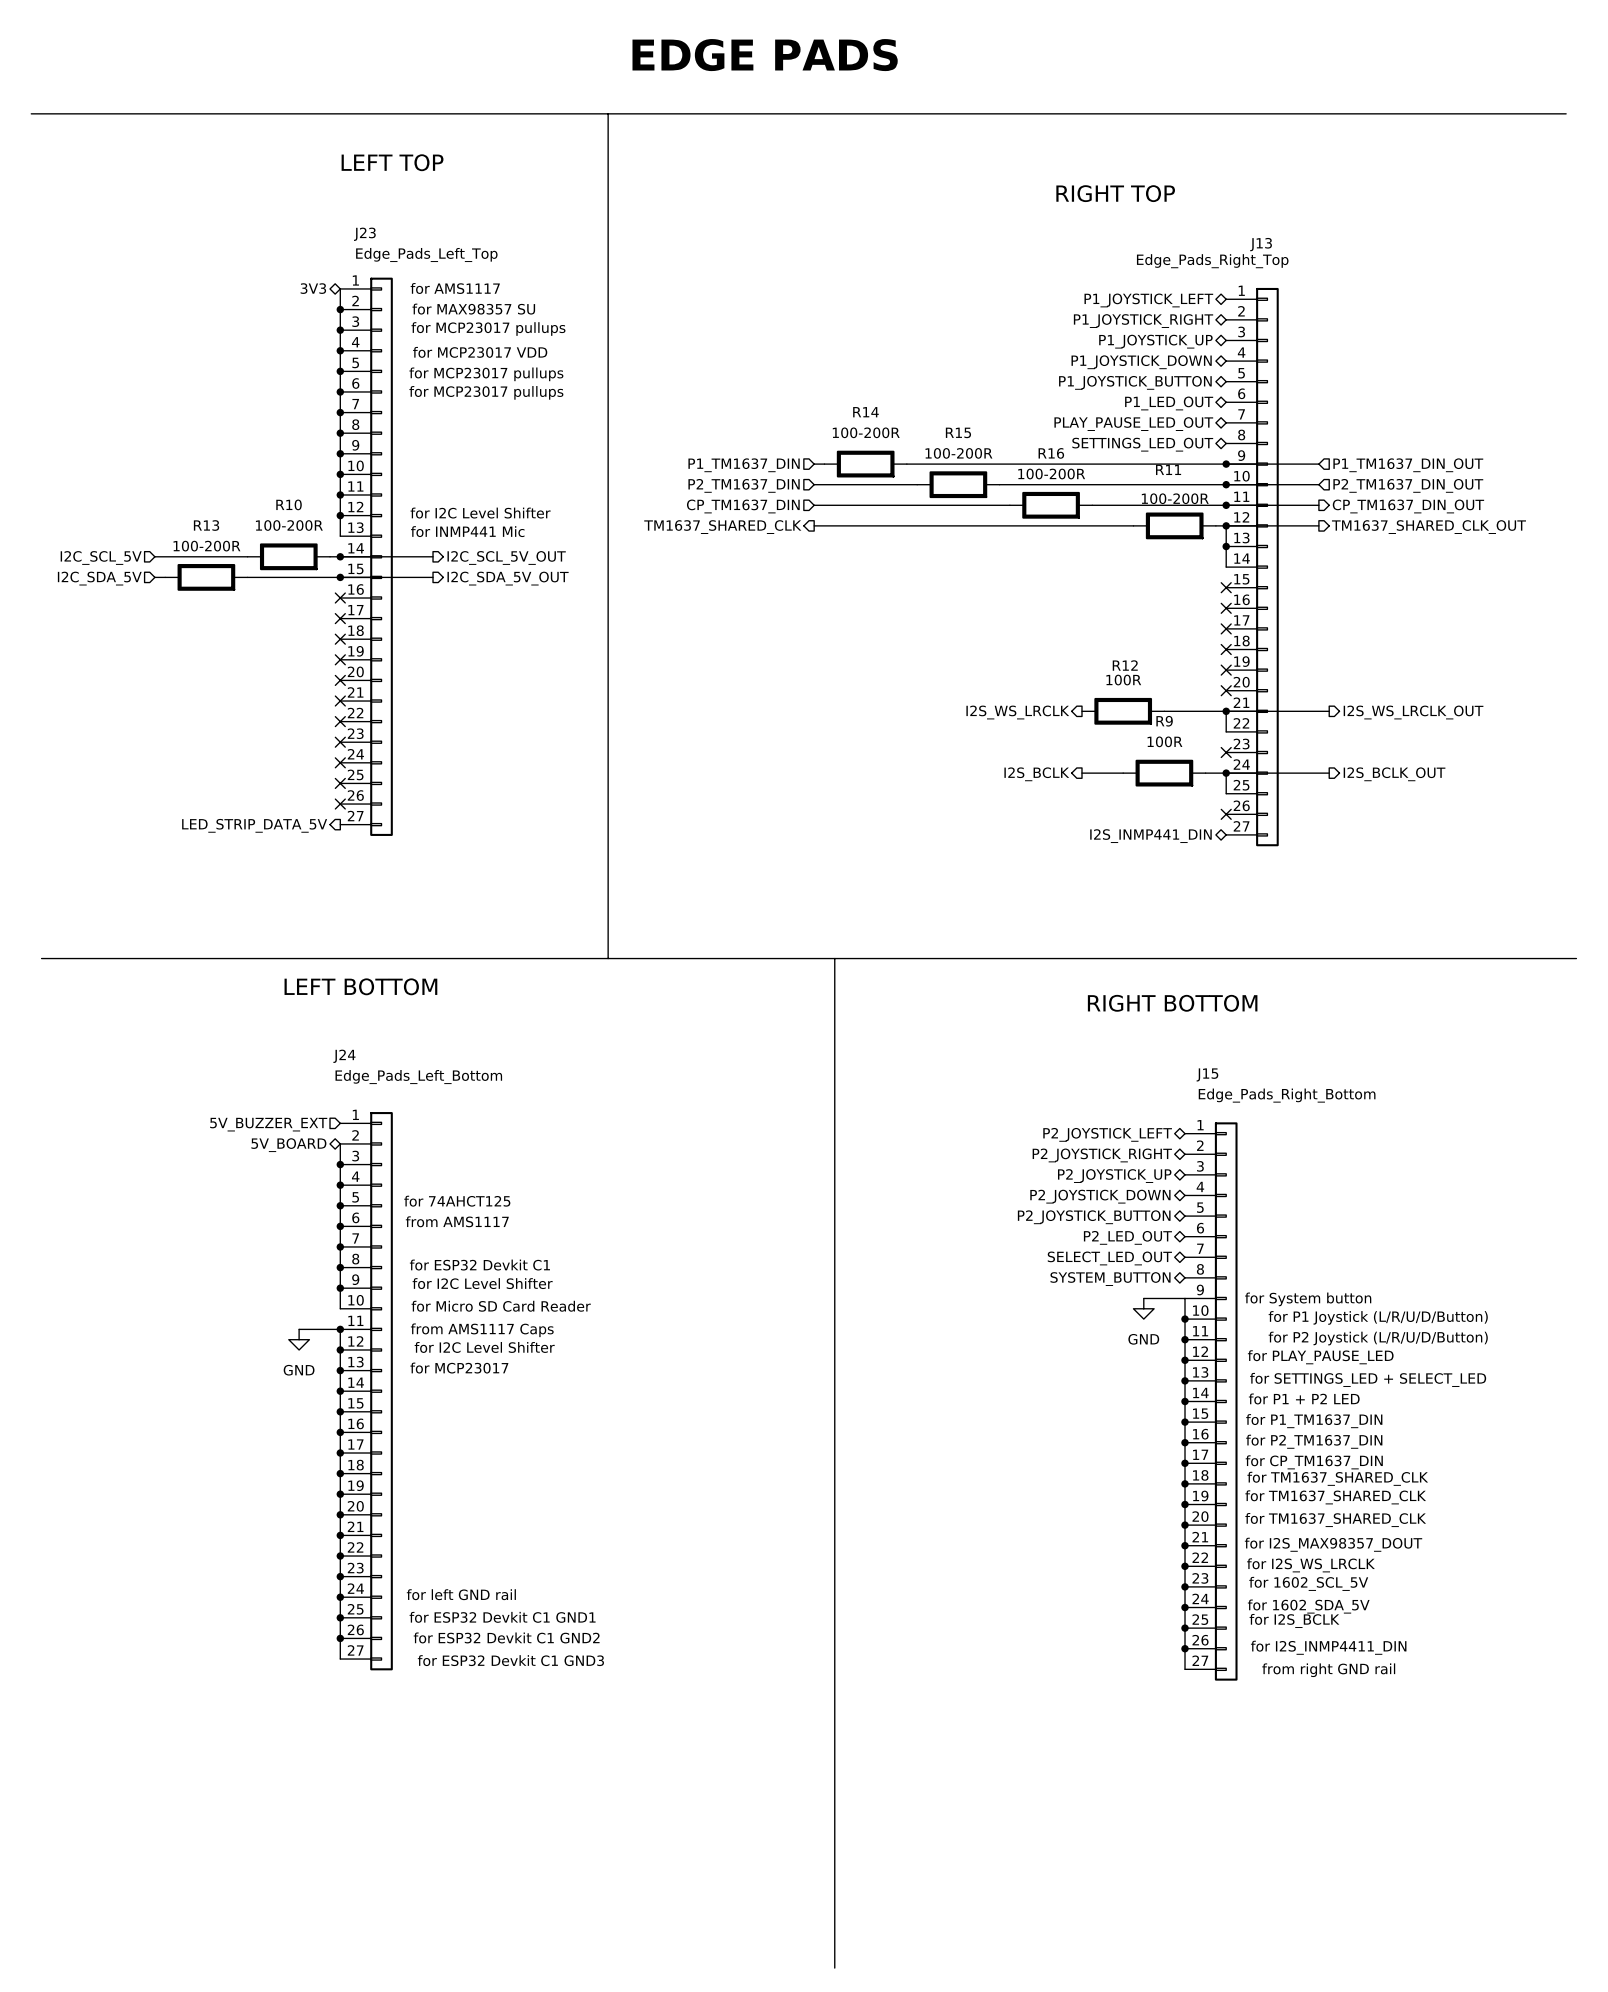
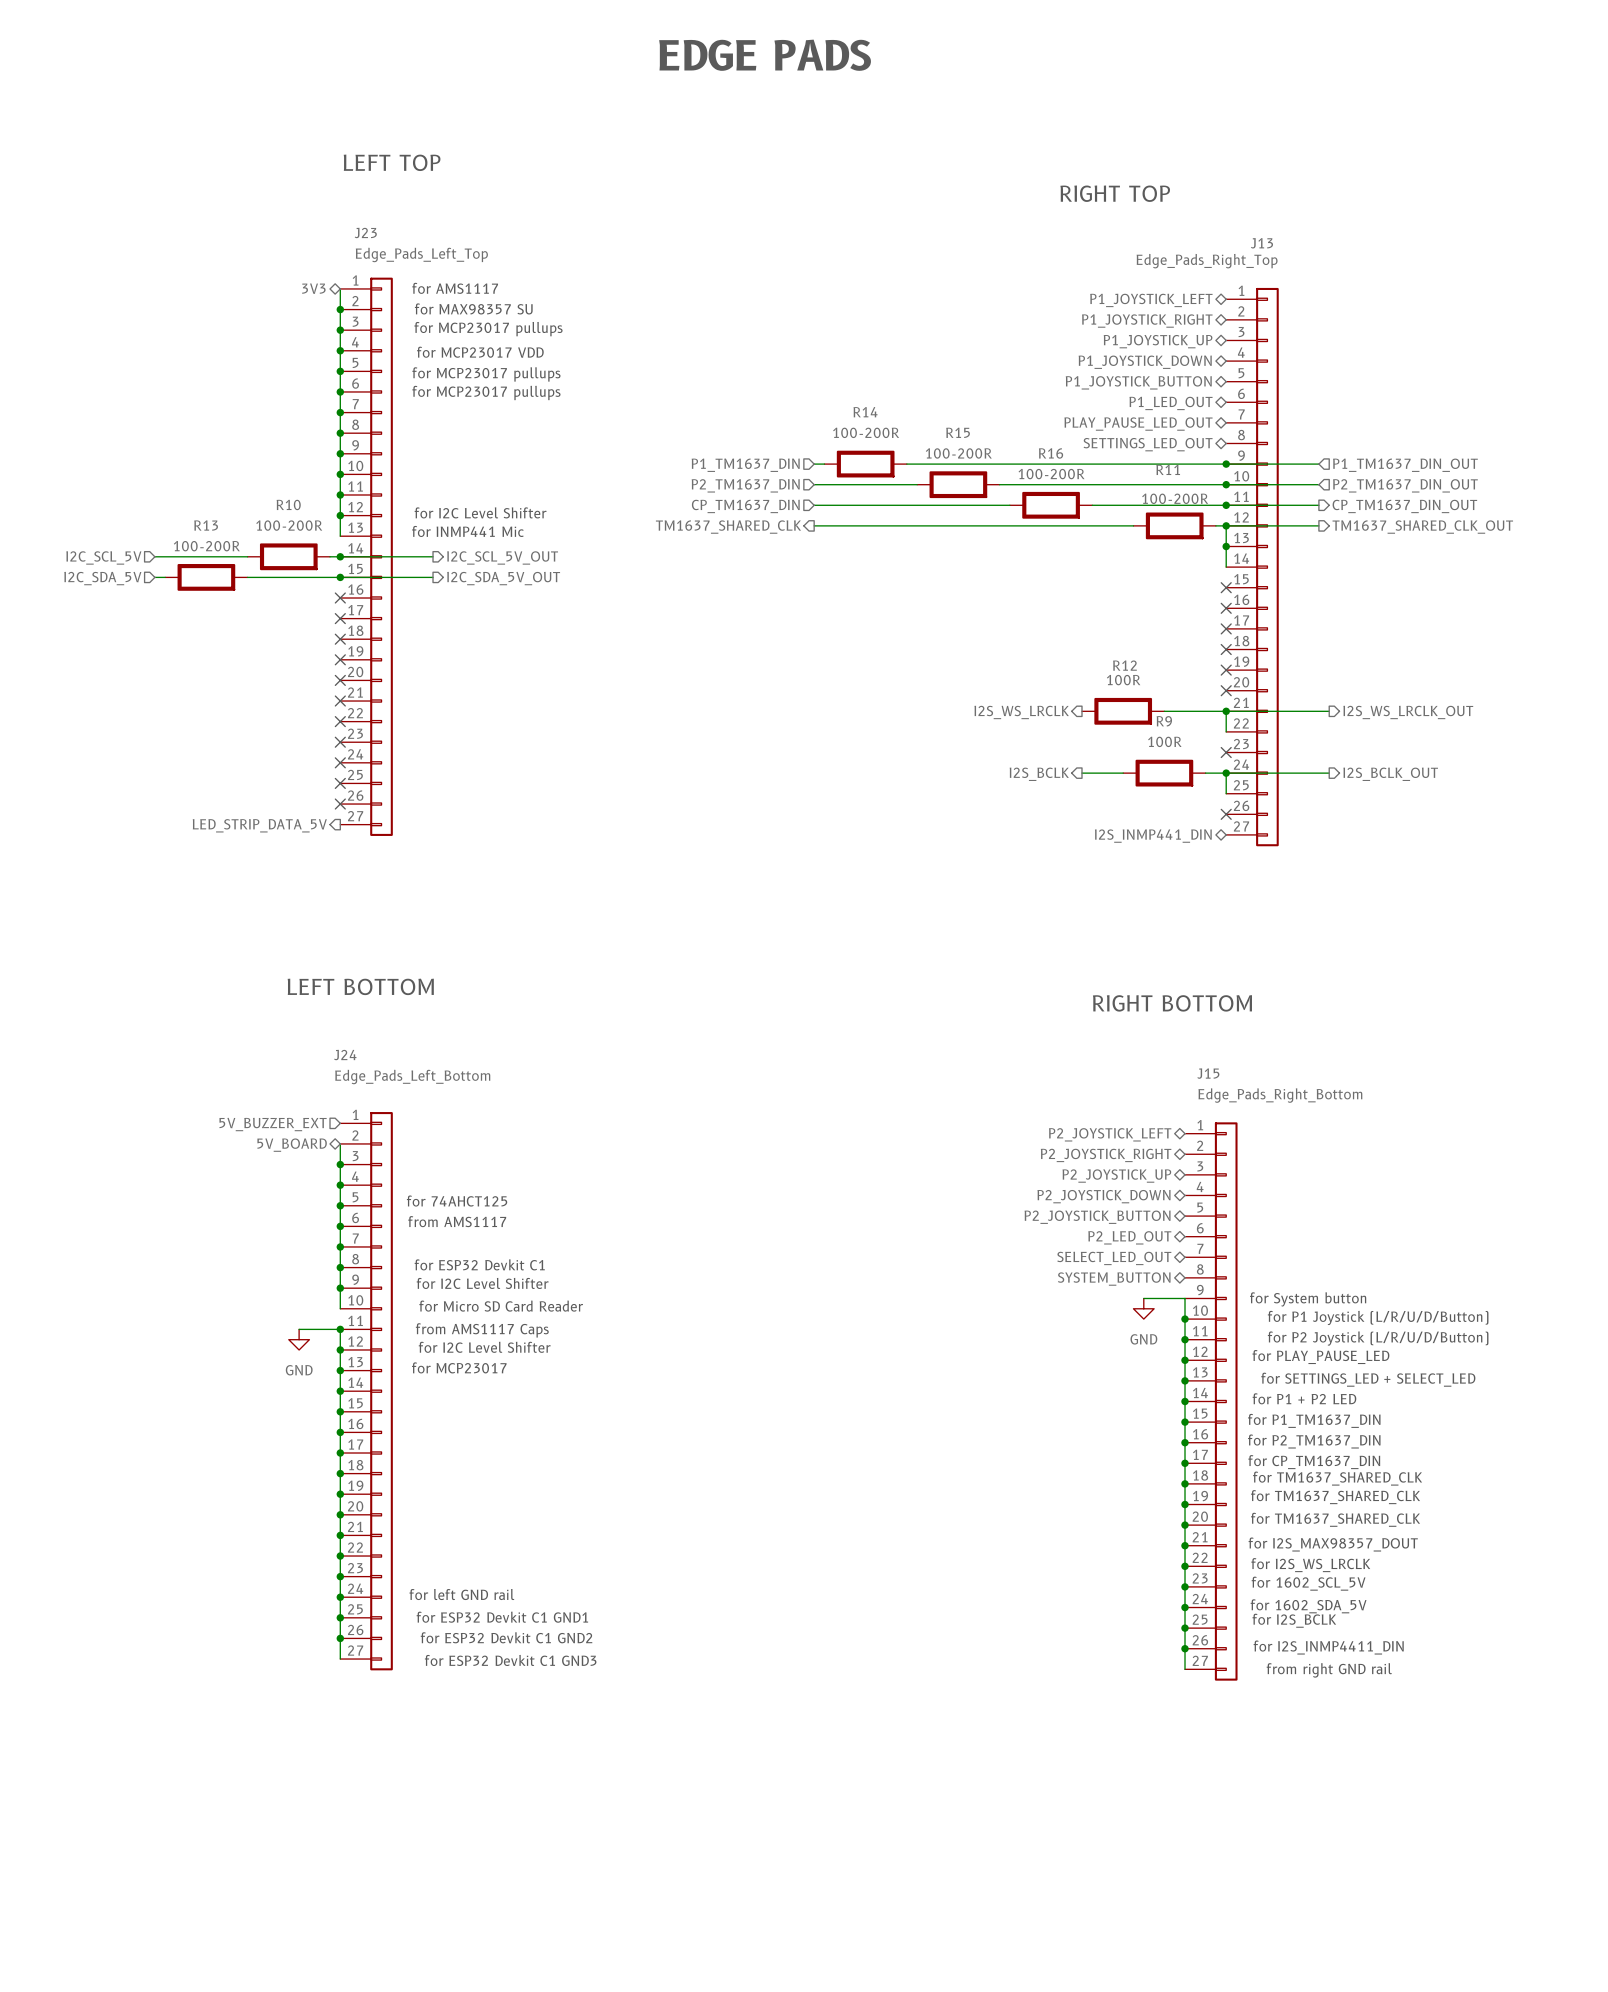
line: (31, 113) (1566, 113) -> none
line: (608, 113) (608, 958) -> none
line: (41, 958) (1576, 958) -> none
line: (834, 958) (834, 1968) -> none

